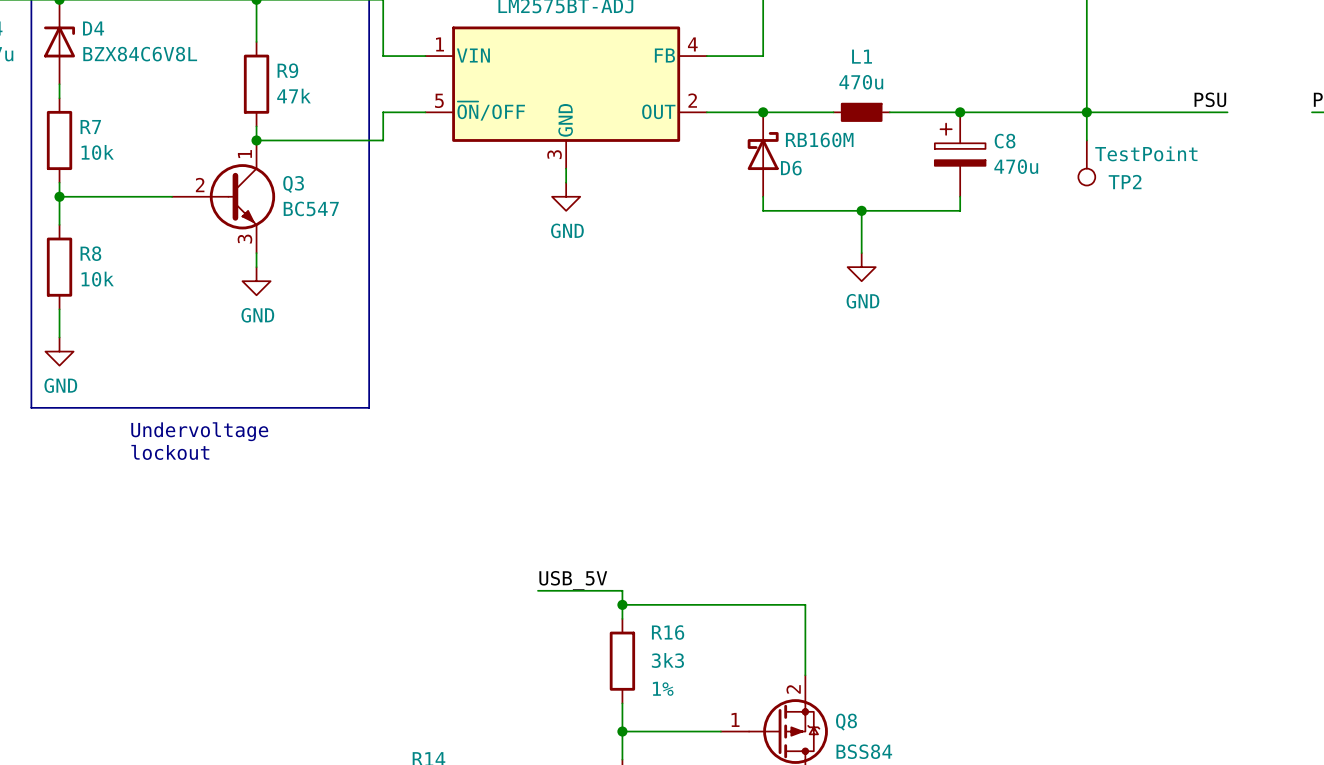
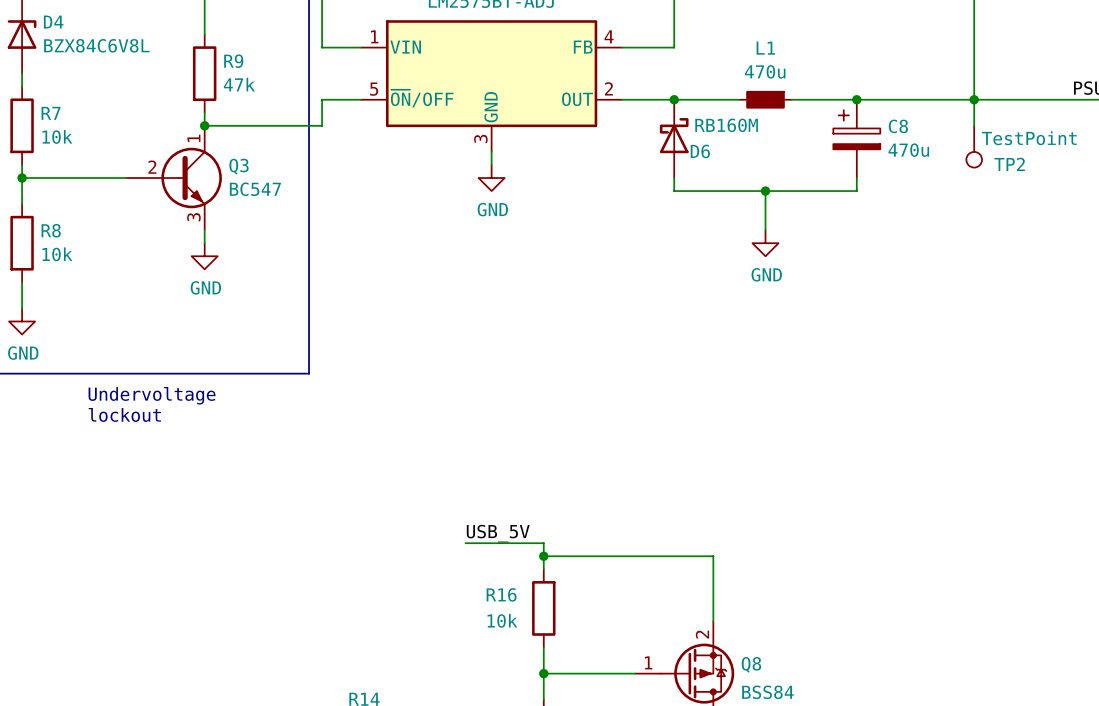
R16 name position: R16 (668, 632) -> R16 (501, 594)
R16 value: 3k3 (667, 660) -> 10k (502, 620)
R16 text: 1% (663, 688) -> none

